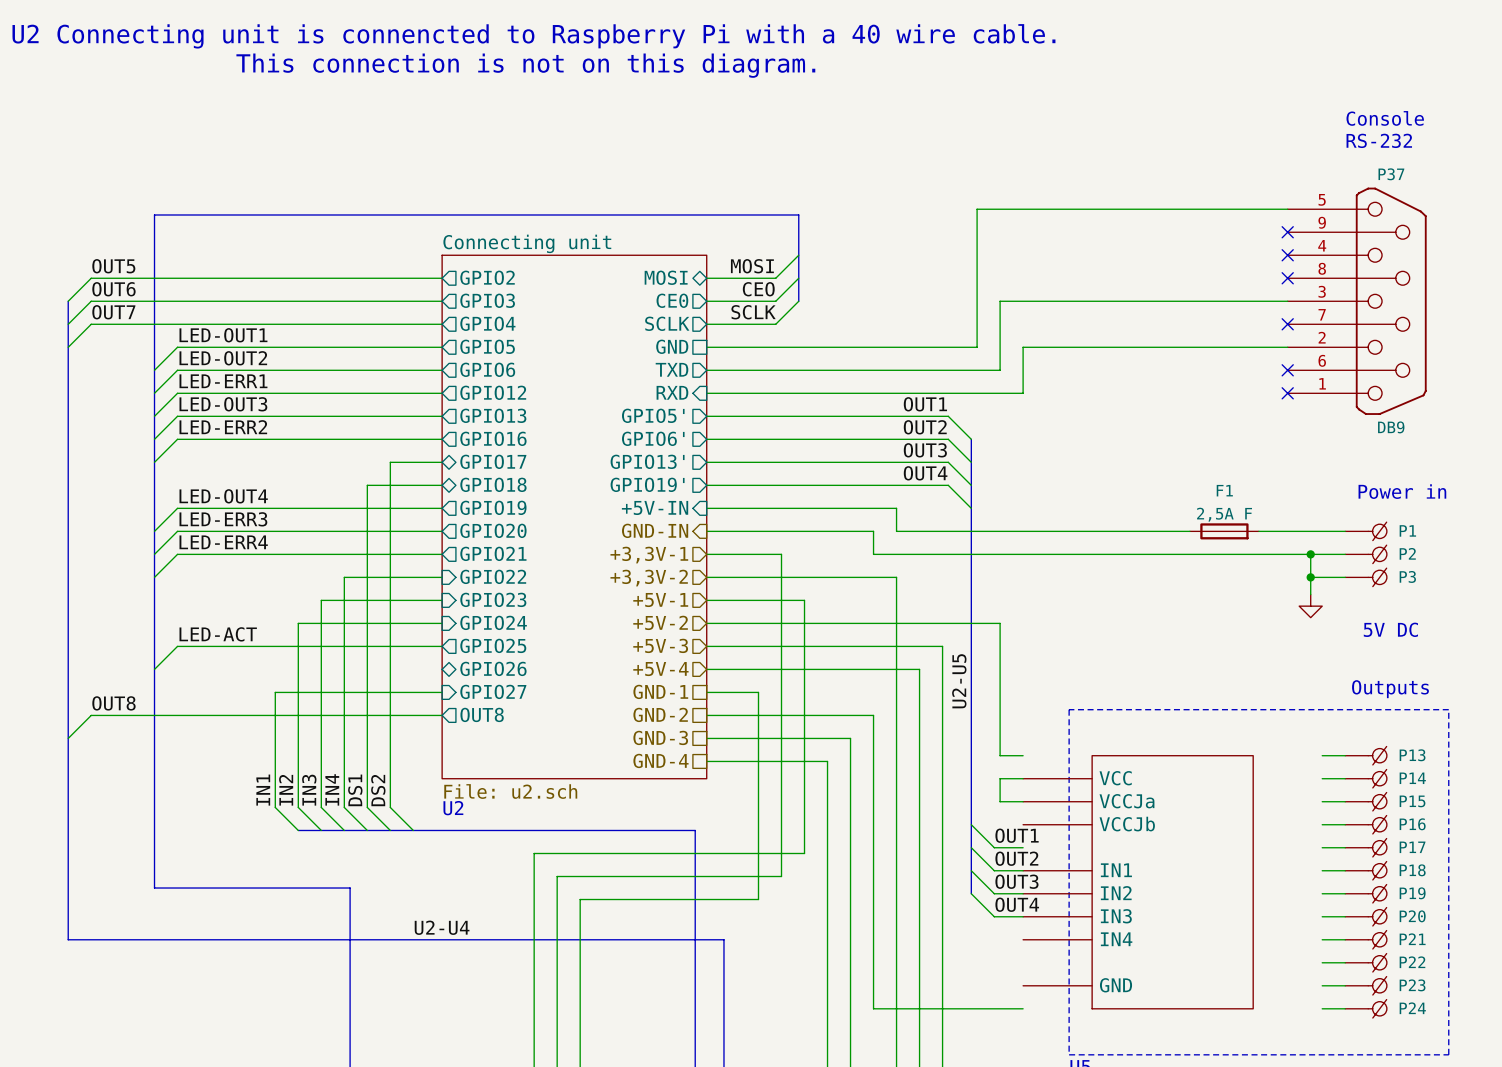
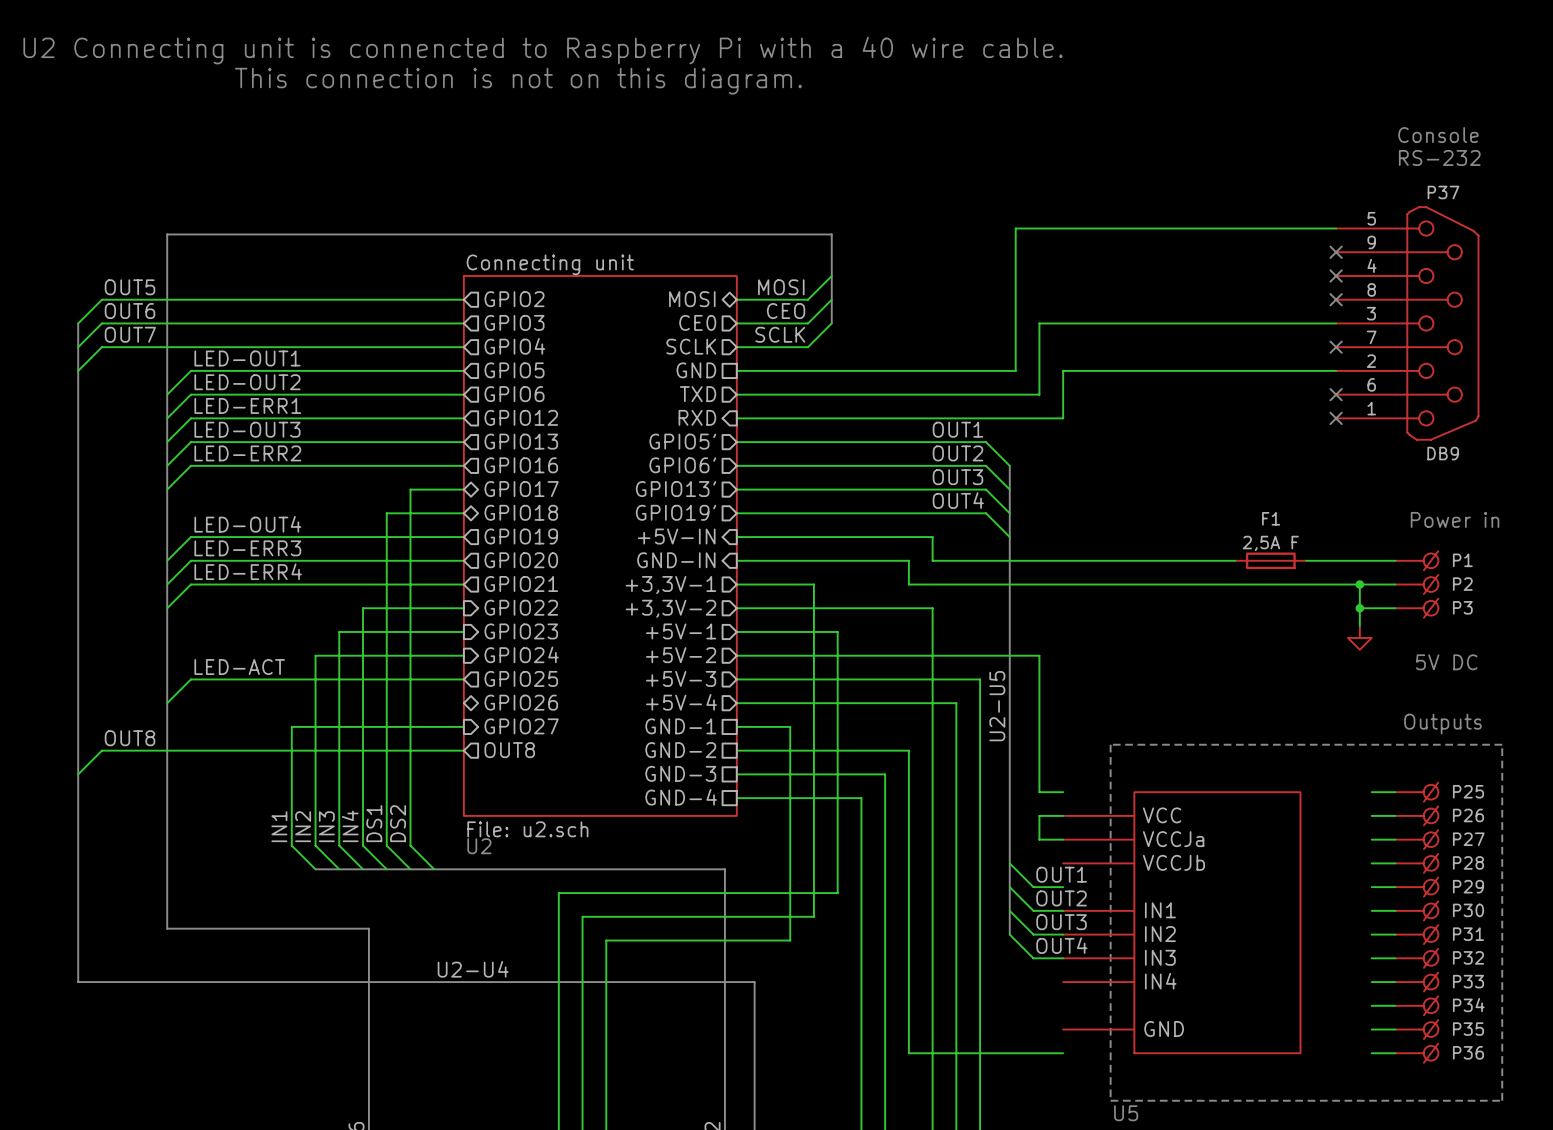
P13 name: P13 (1412, 755) -> P25 (1468, 791)
P14 name: P14 (1412, 778) -> P26 (1468, 815)
P15 name: P15 (1412, 801) -> P27 (1468, 839)
P16 name: P16 (1412, 824) -> P28 (1468, 862)
P17 name: P17 (1412, 847) -> P29 (1468, 886)
P18 name: P18 (1412, 870) -> P30 (1468, 910)
P19 name: P19 (1412, 893) -> P31 (1468, 934)
P20 name: P20 (1412, 916) -> P32 (1468, 957)
P21 name: P21 (1412, 939) -> P33 (1468, 981)
P22 name: P22 (1412, 962) -> P34 (1468, 1005)
P23 name: P23 (1412, 985) -> P35 (1468, 1029)
P24 name: P24 (1412, 1008) -> P36 (1468, 1052)

